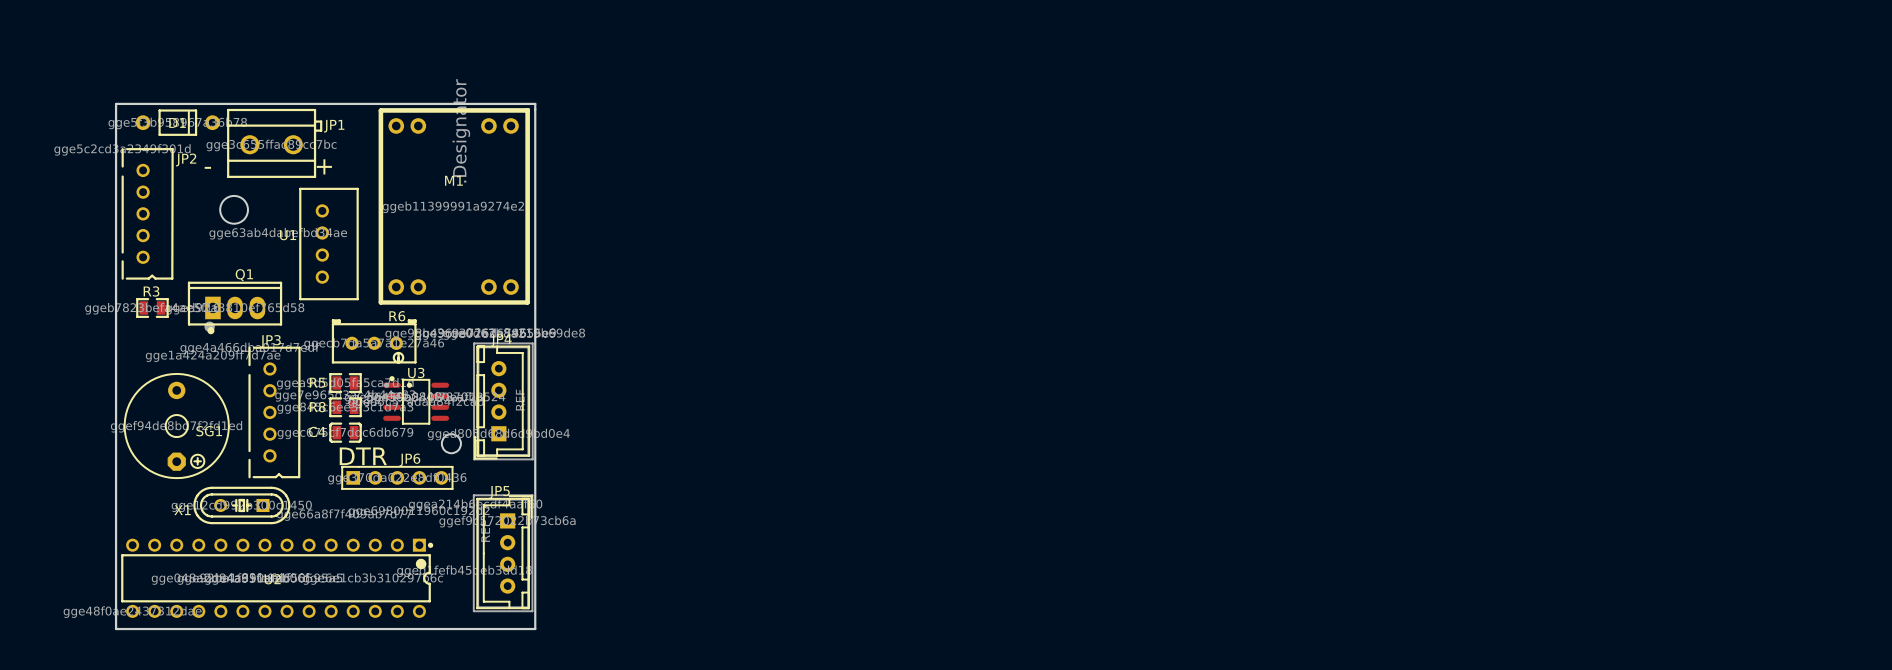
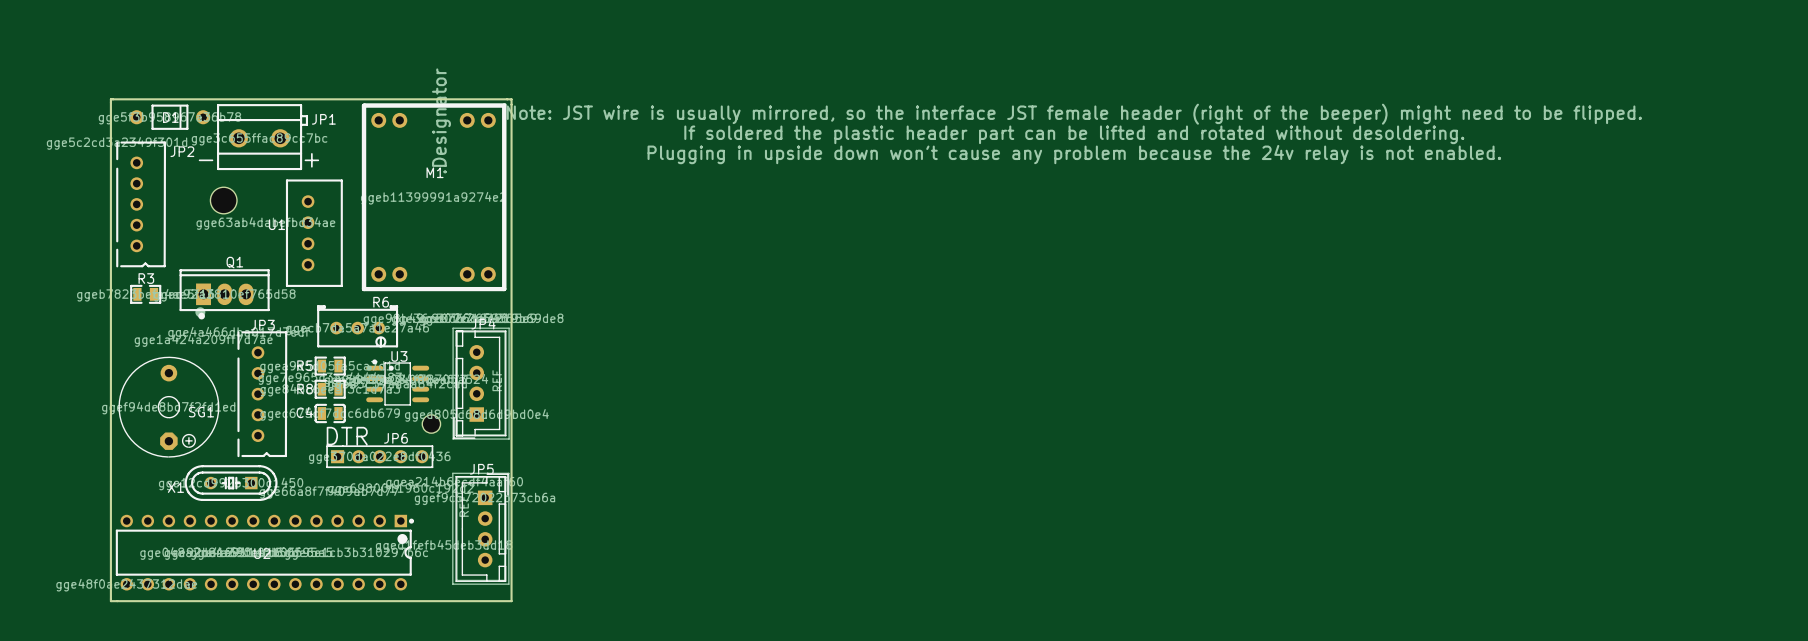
text: none -> Note: JST wire is usually mirrored, so the interface JST female header (right of the beeper) might need to be flipped. (1074, 114)
text: none -> If soldered the plastic header part can be lifted and rotated without desoldering. (1074, 134)
text: none -> Plugging in upside down won't cause any problem because the 24v relay is not enabled. (1074, 154)

